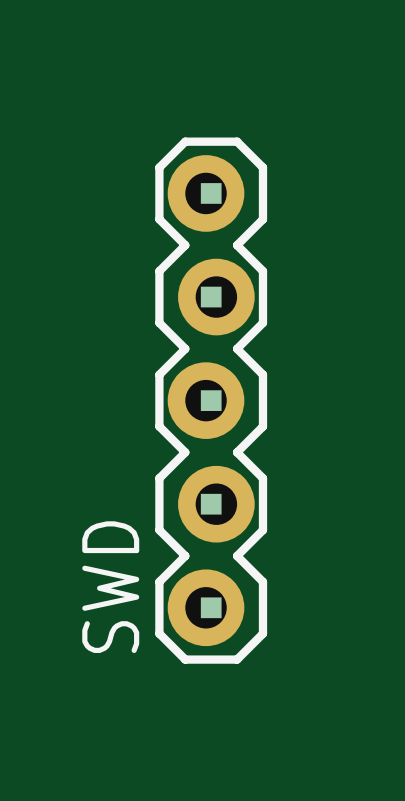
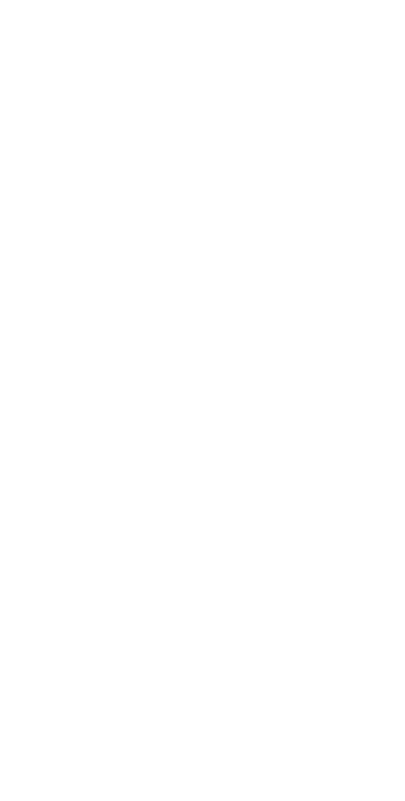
SWD: (211, 400) -> none

